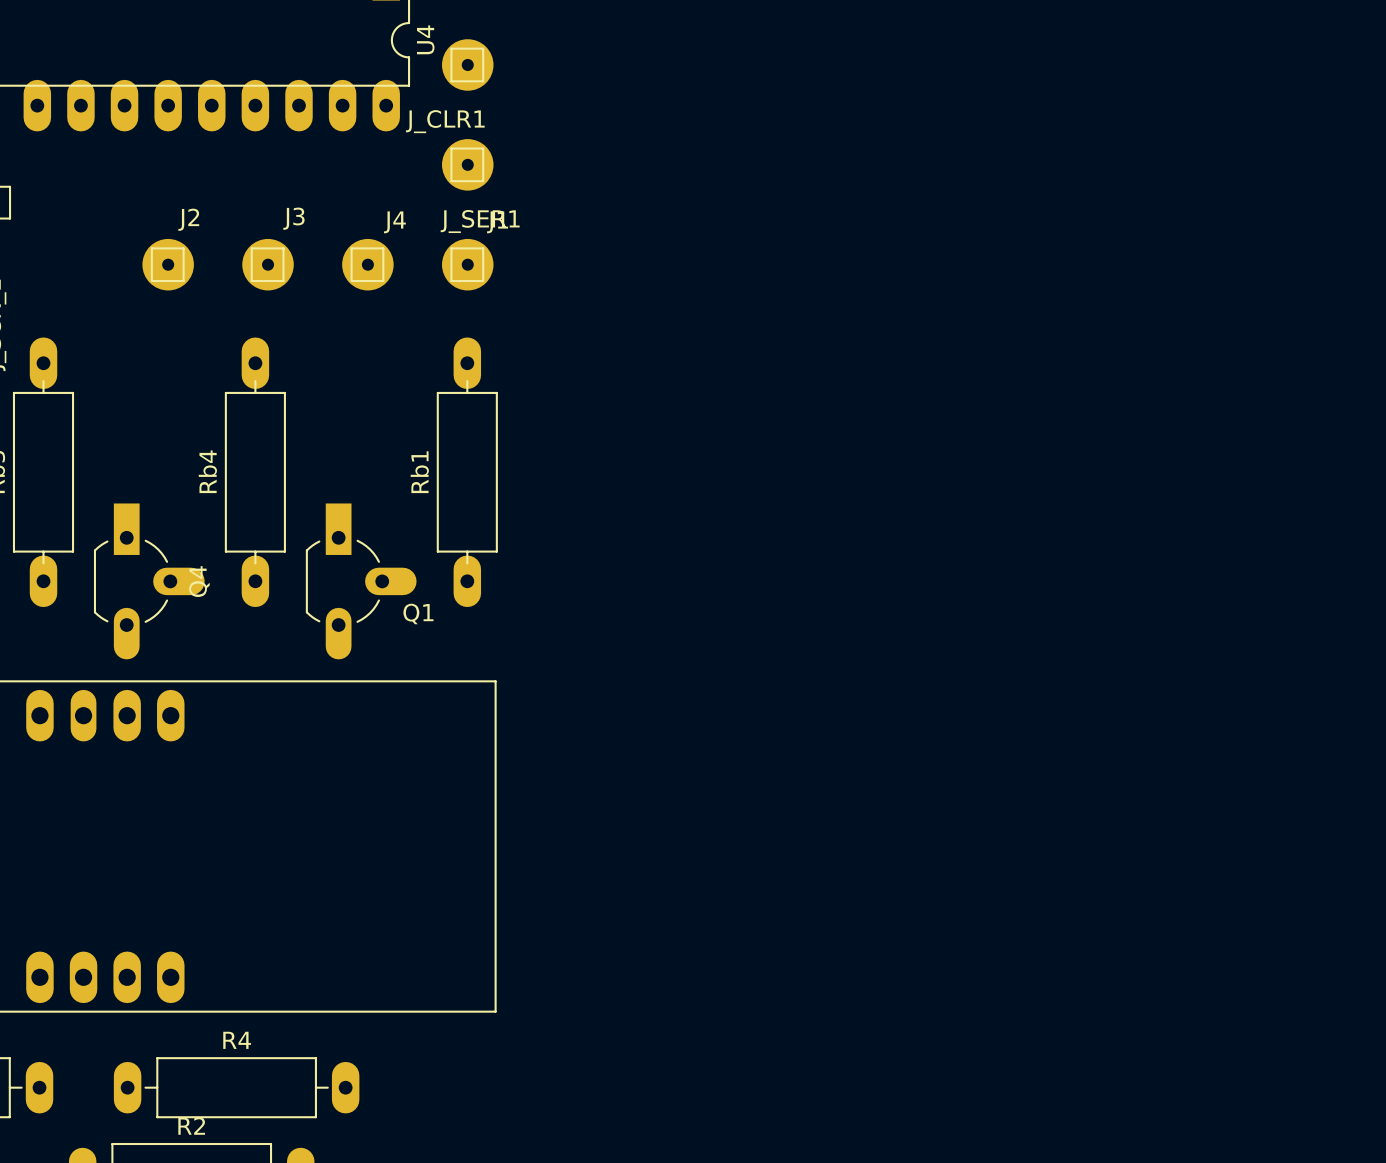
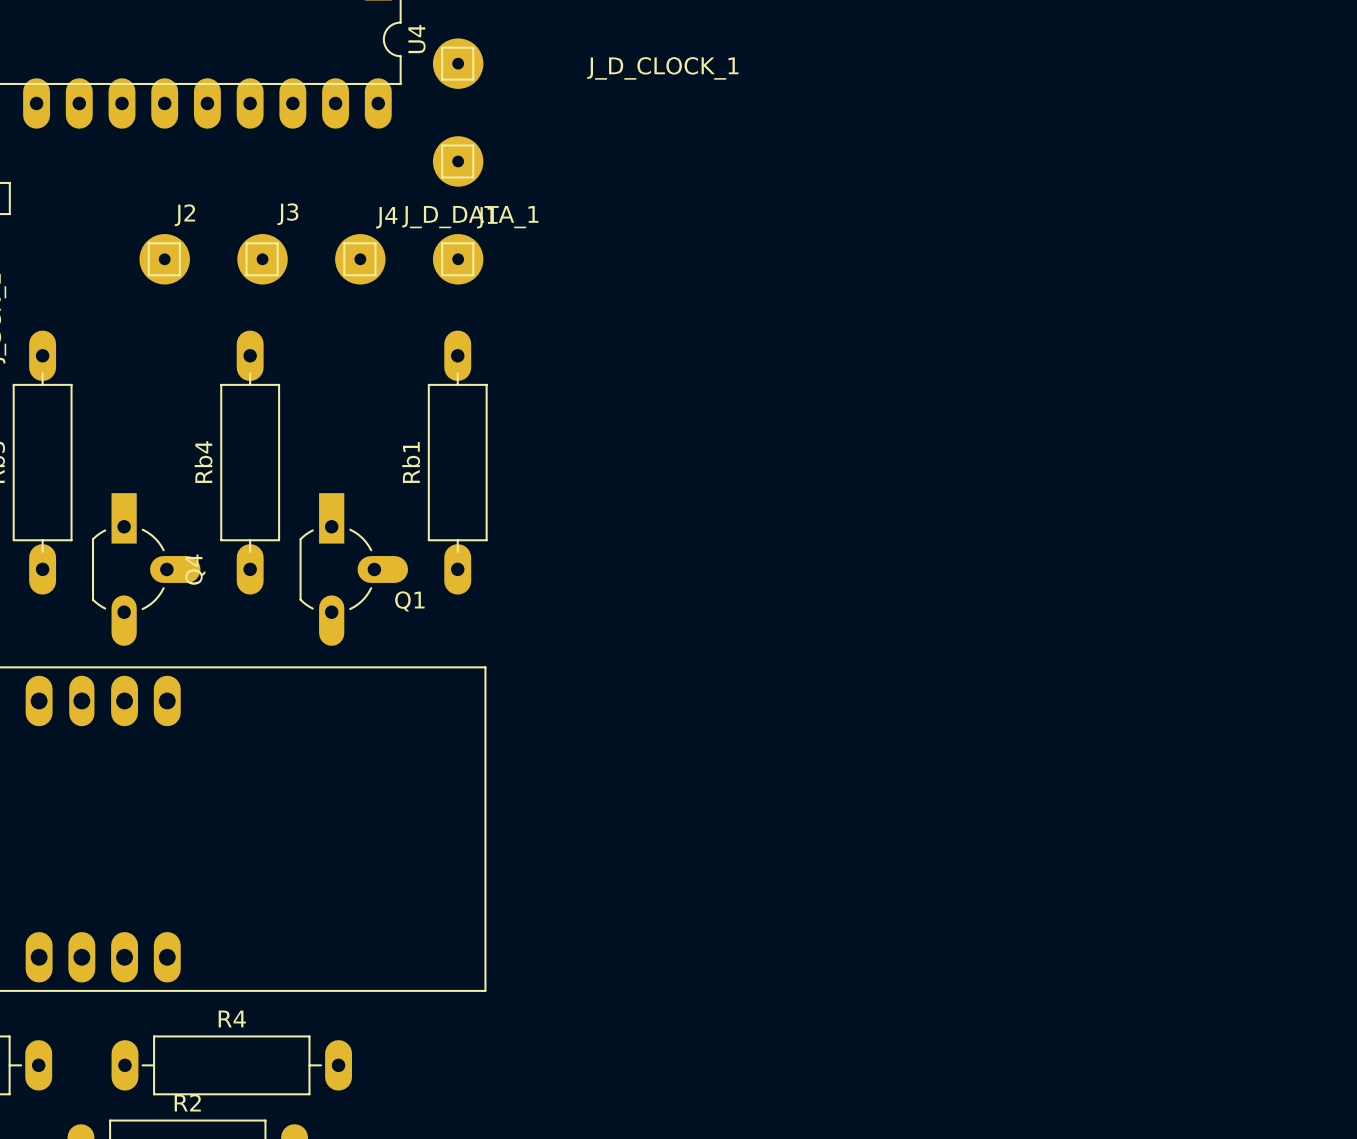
J_CLR1 name: J_CLR1 (445, 121) -> J_D_CLOCK_1 (662, 68)
J_SER1 name: J_SER1 (480, 221) -> J_D_DATA_1 (470, 217)

